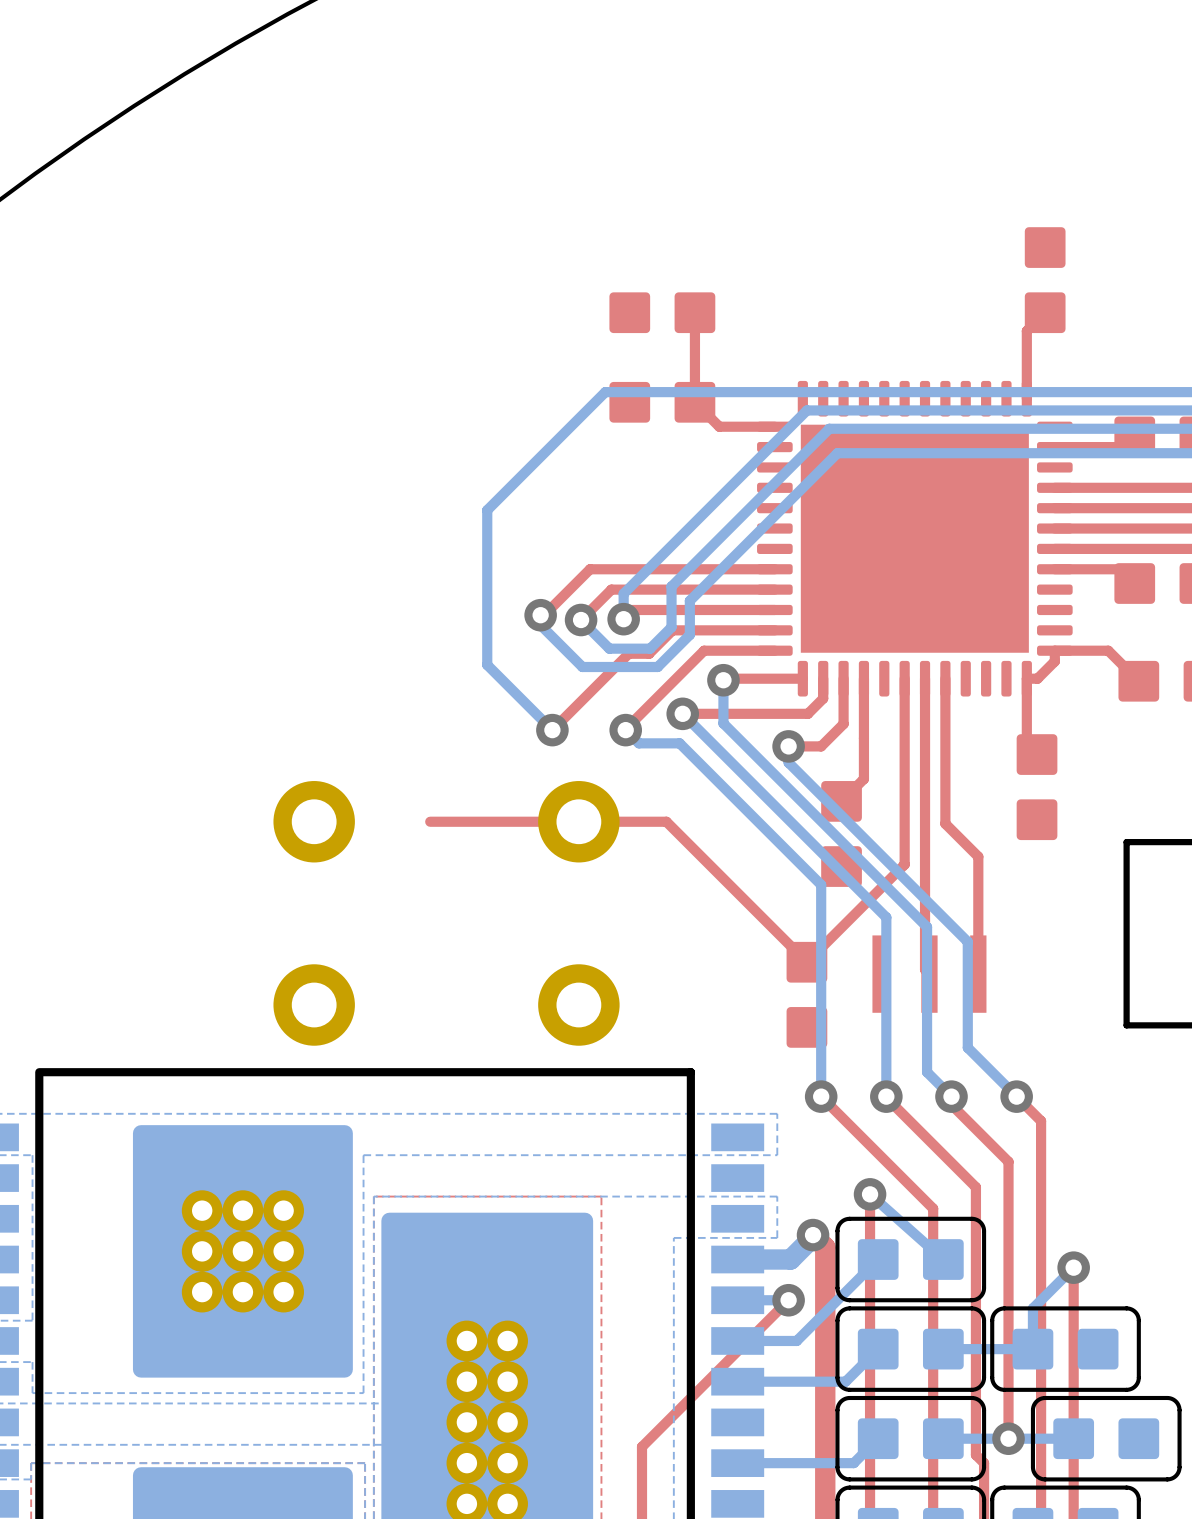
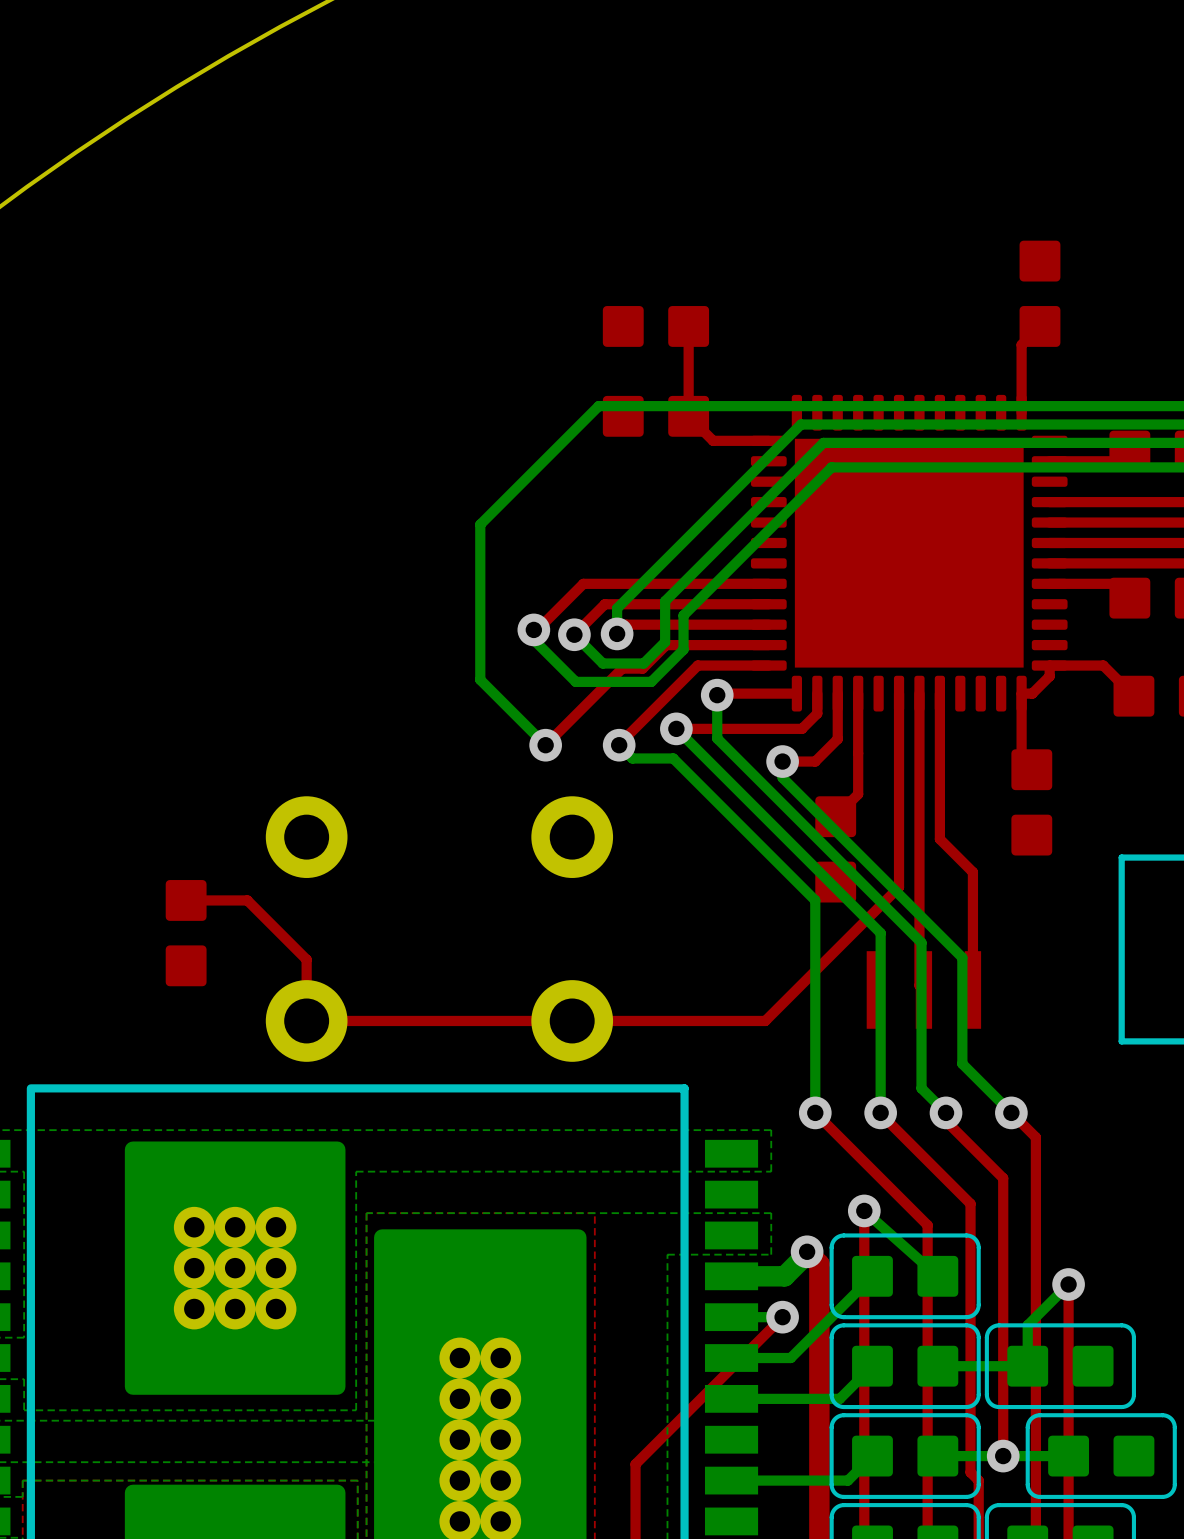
top track: (430, 821) (666, 821) (806, 962) (904, 864) -> (186, 900) (247, 900) (306, 959) (306, 1020) (765, 1020) (899, 887) (899, 880)
part position: (806, 994) -> (186, 933)

